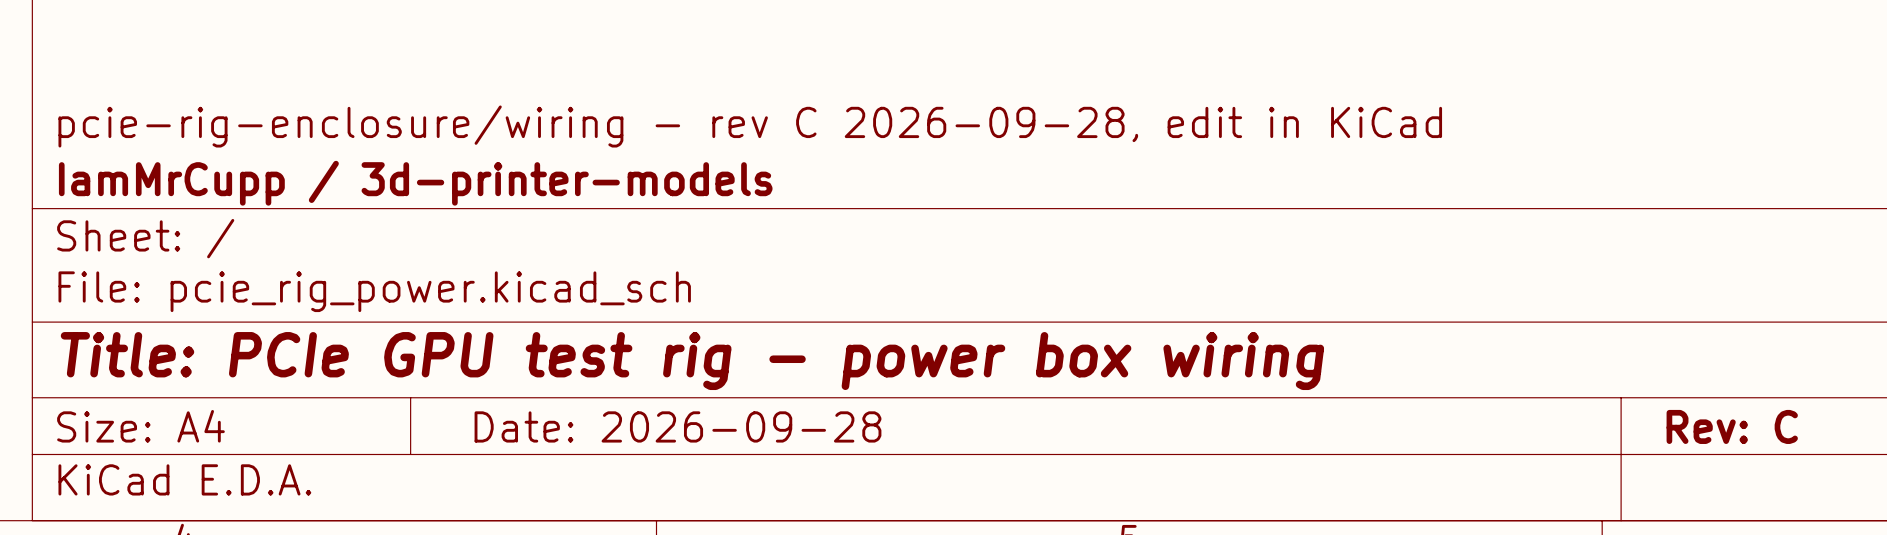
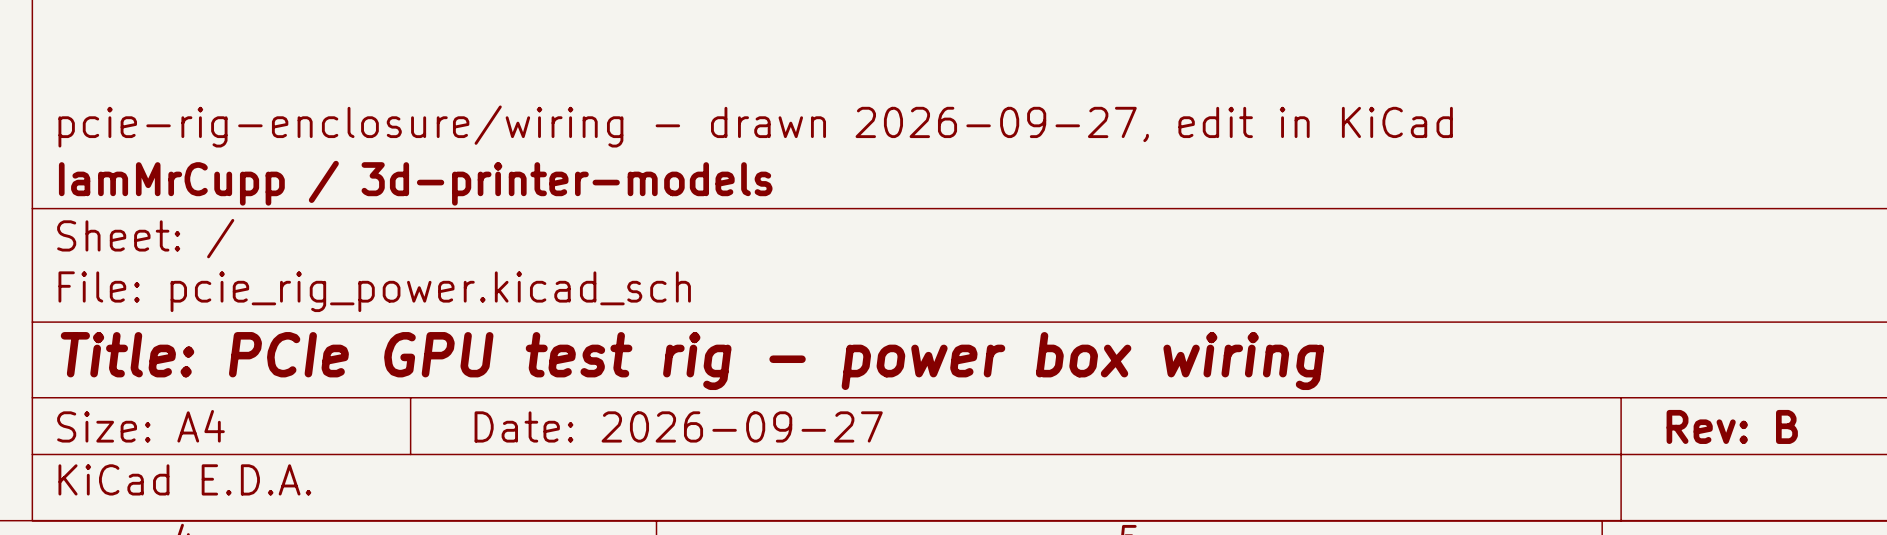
title block: pcie-rig-enclosure/wiring - rev C 2026-09-28, edit in KiCad (750, 126) -> pcie-rig-enclosure/wiring - drawn 2026-09-27, edit in KiCad (755, 126)
title block: Date: 2026-09-28 (677, 426) -> Date: 2026-09-27 (678, 426)
title block: Rev: C (1732, 426) -> Rev: B (1732, 426)

